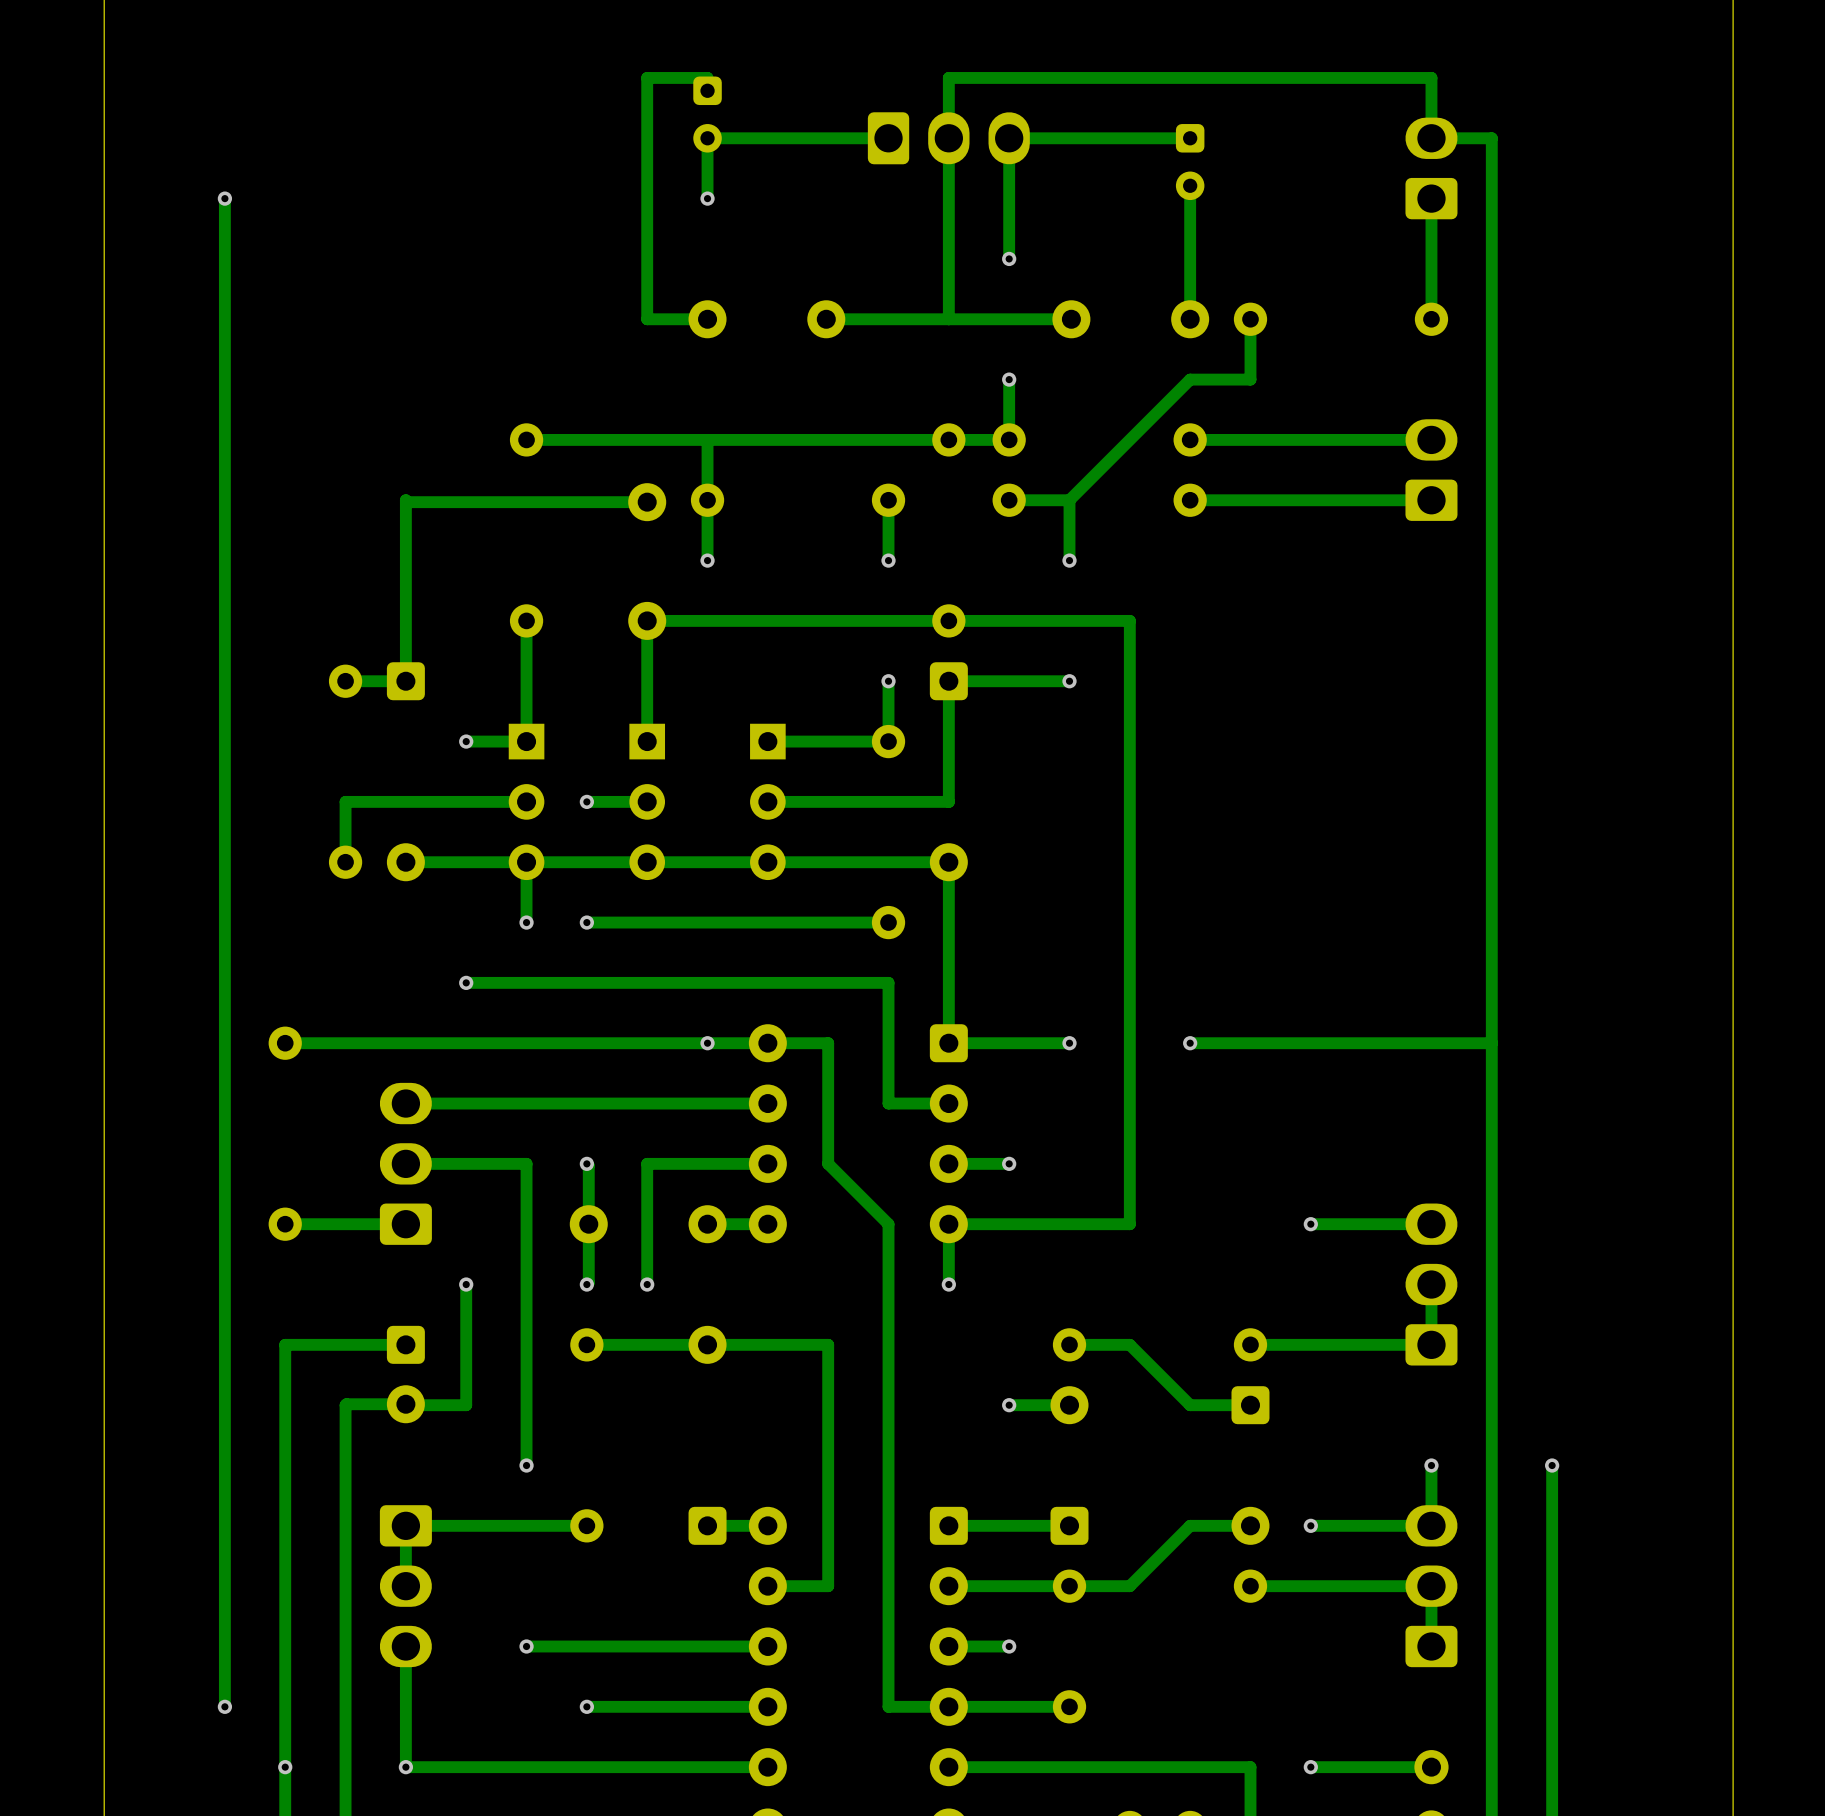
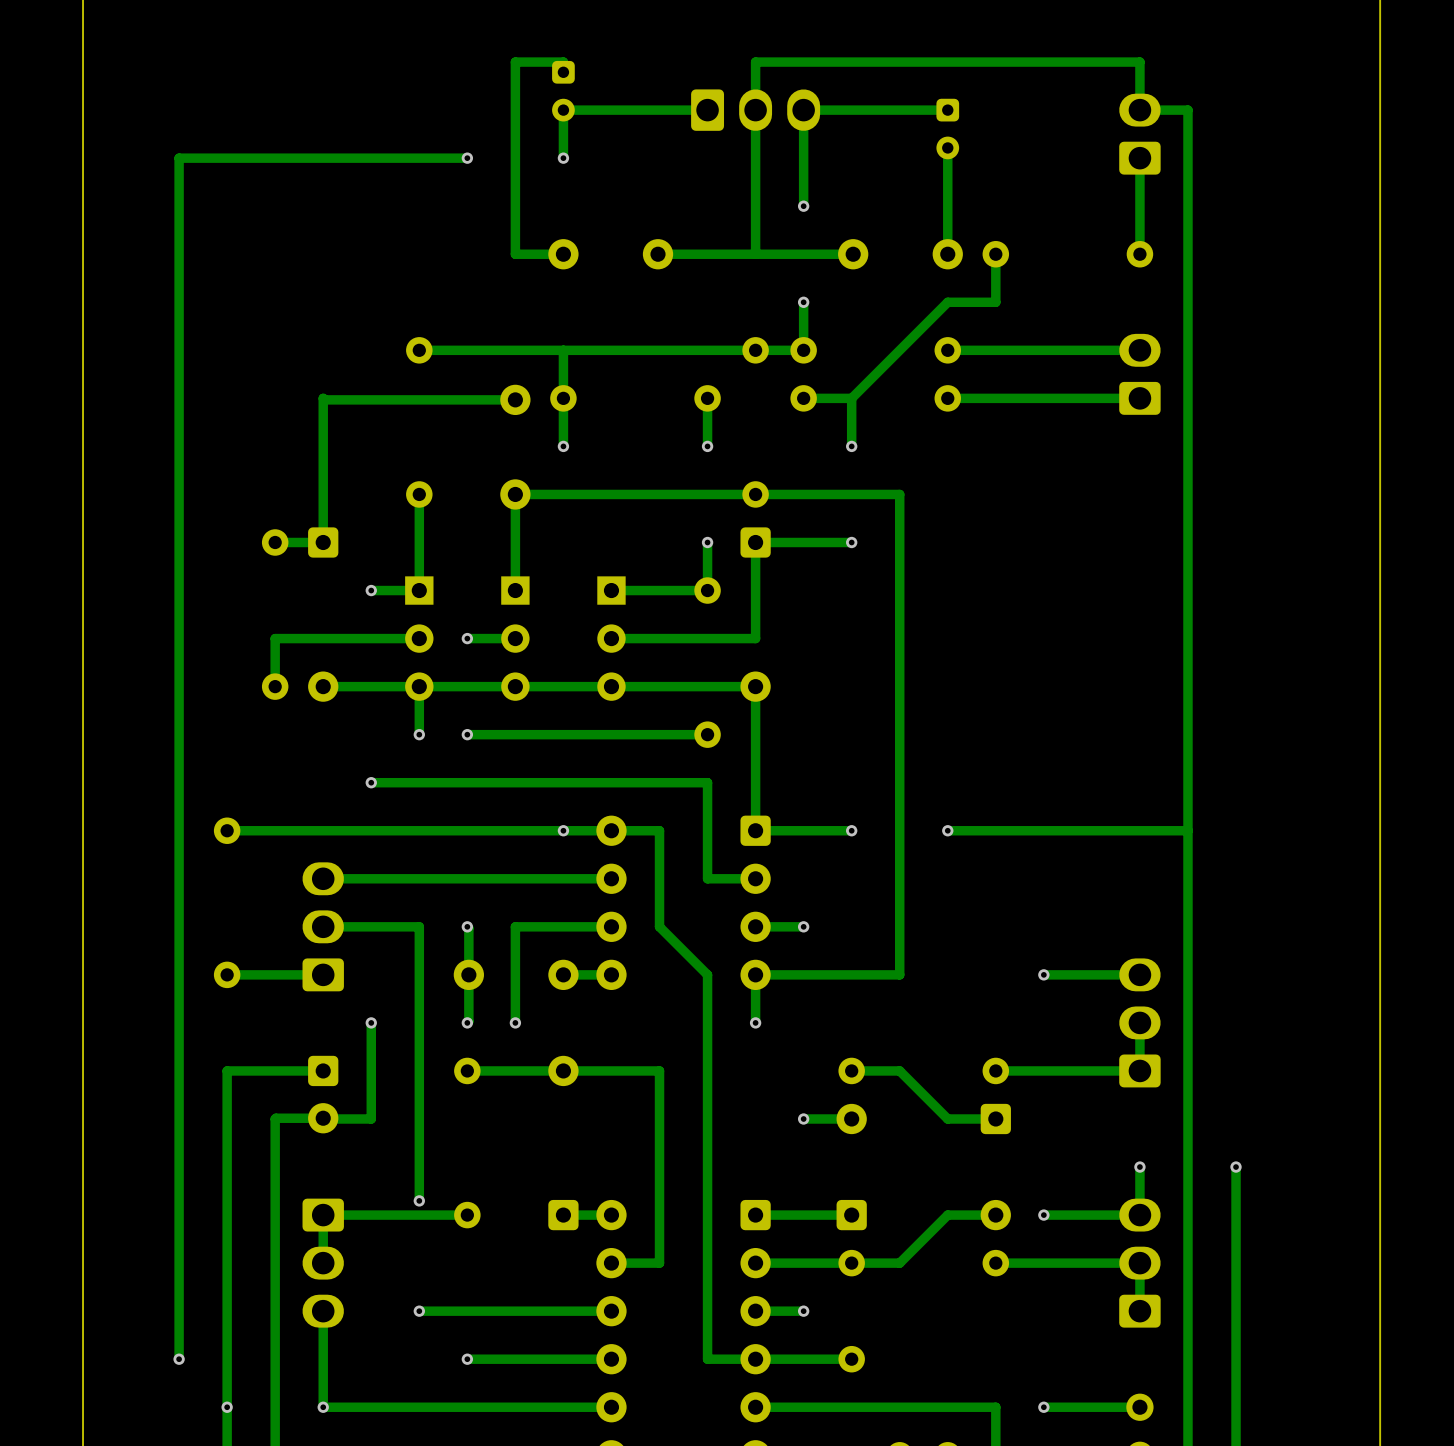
via: (224, 198) -> none
track: none -> (467, 158) (179, 158)
via: none -> (467, 158)
track: none -> (419, 1167) (419, 1200)
via position: (526, 1465) -> (419, 1200)

